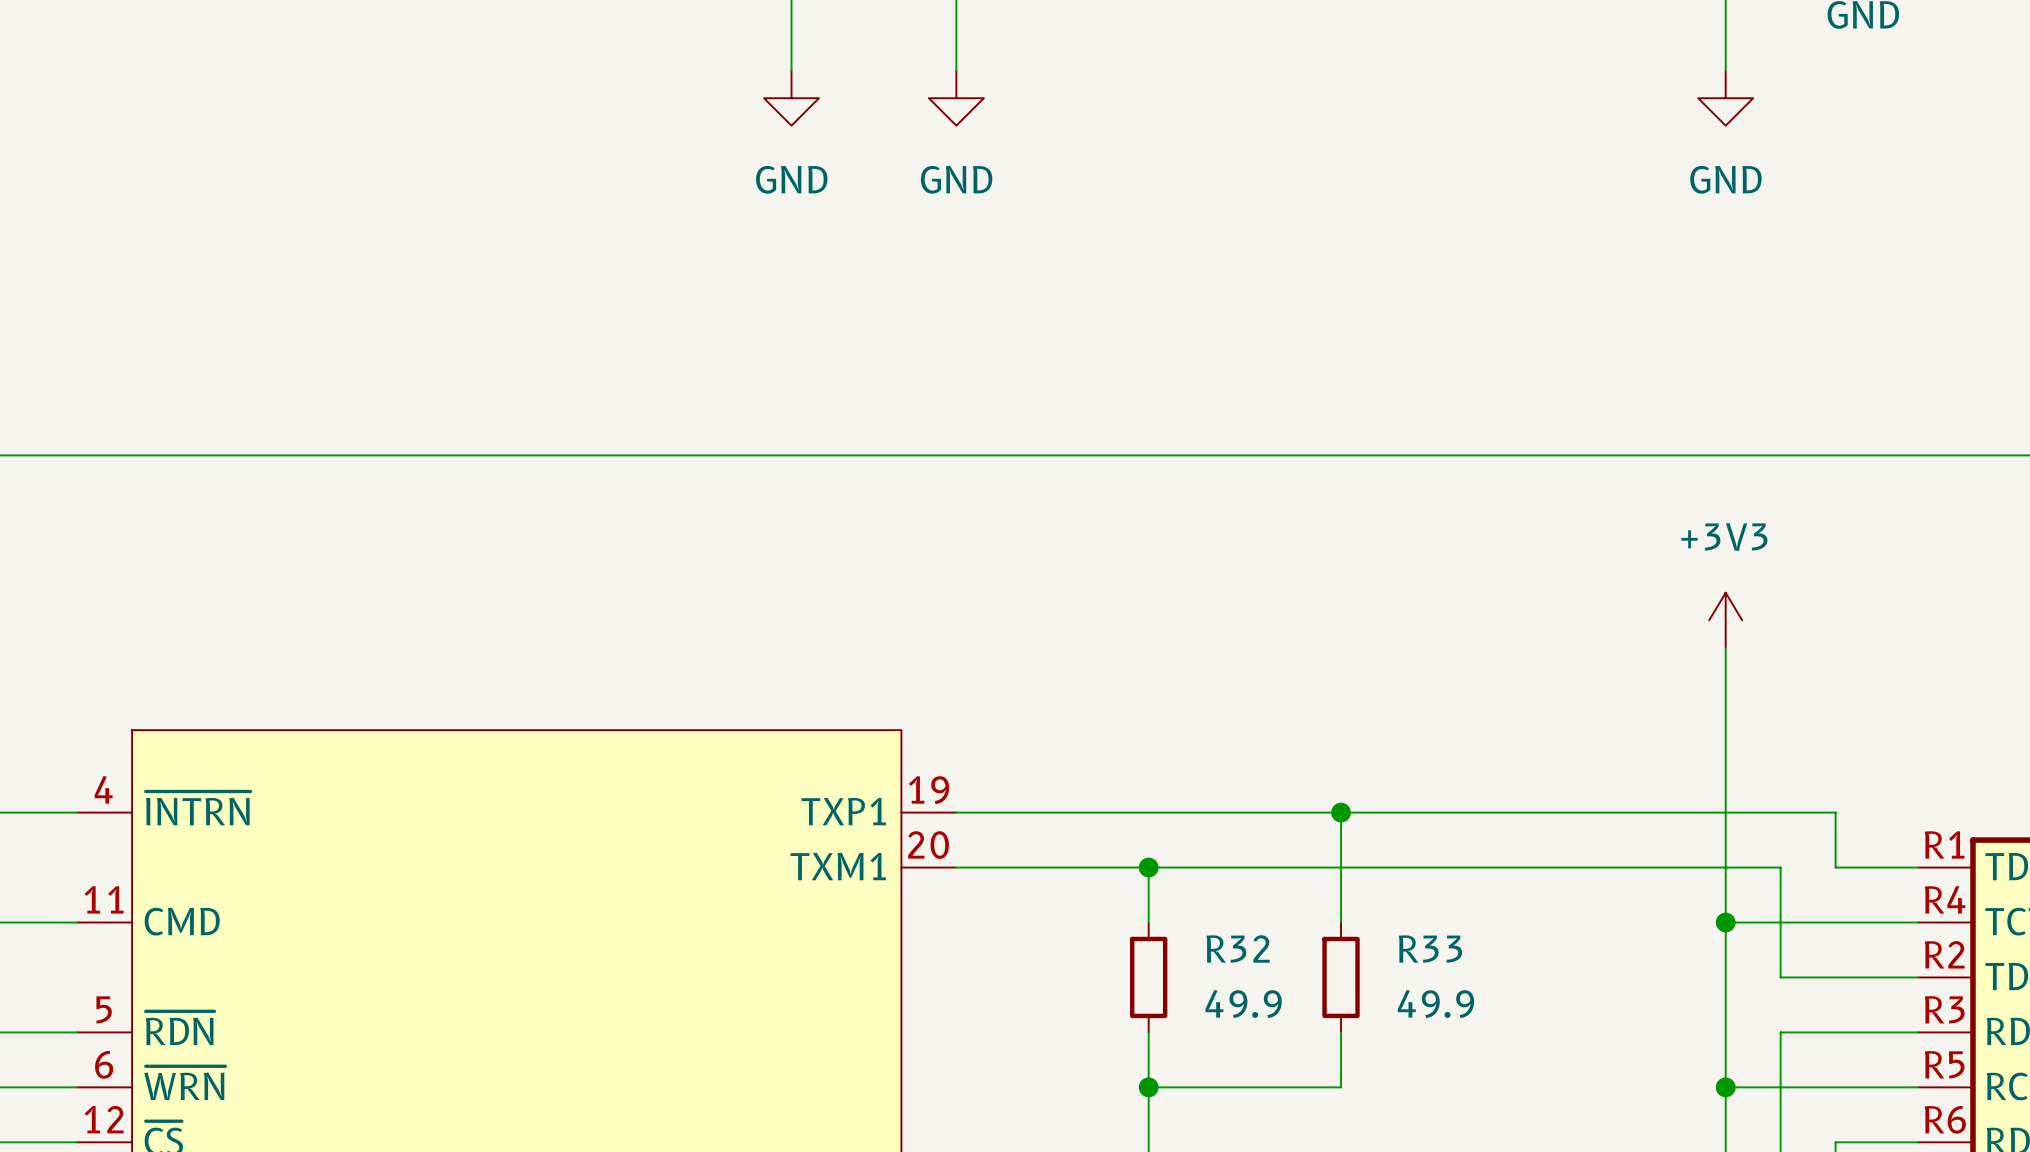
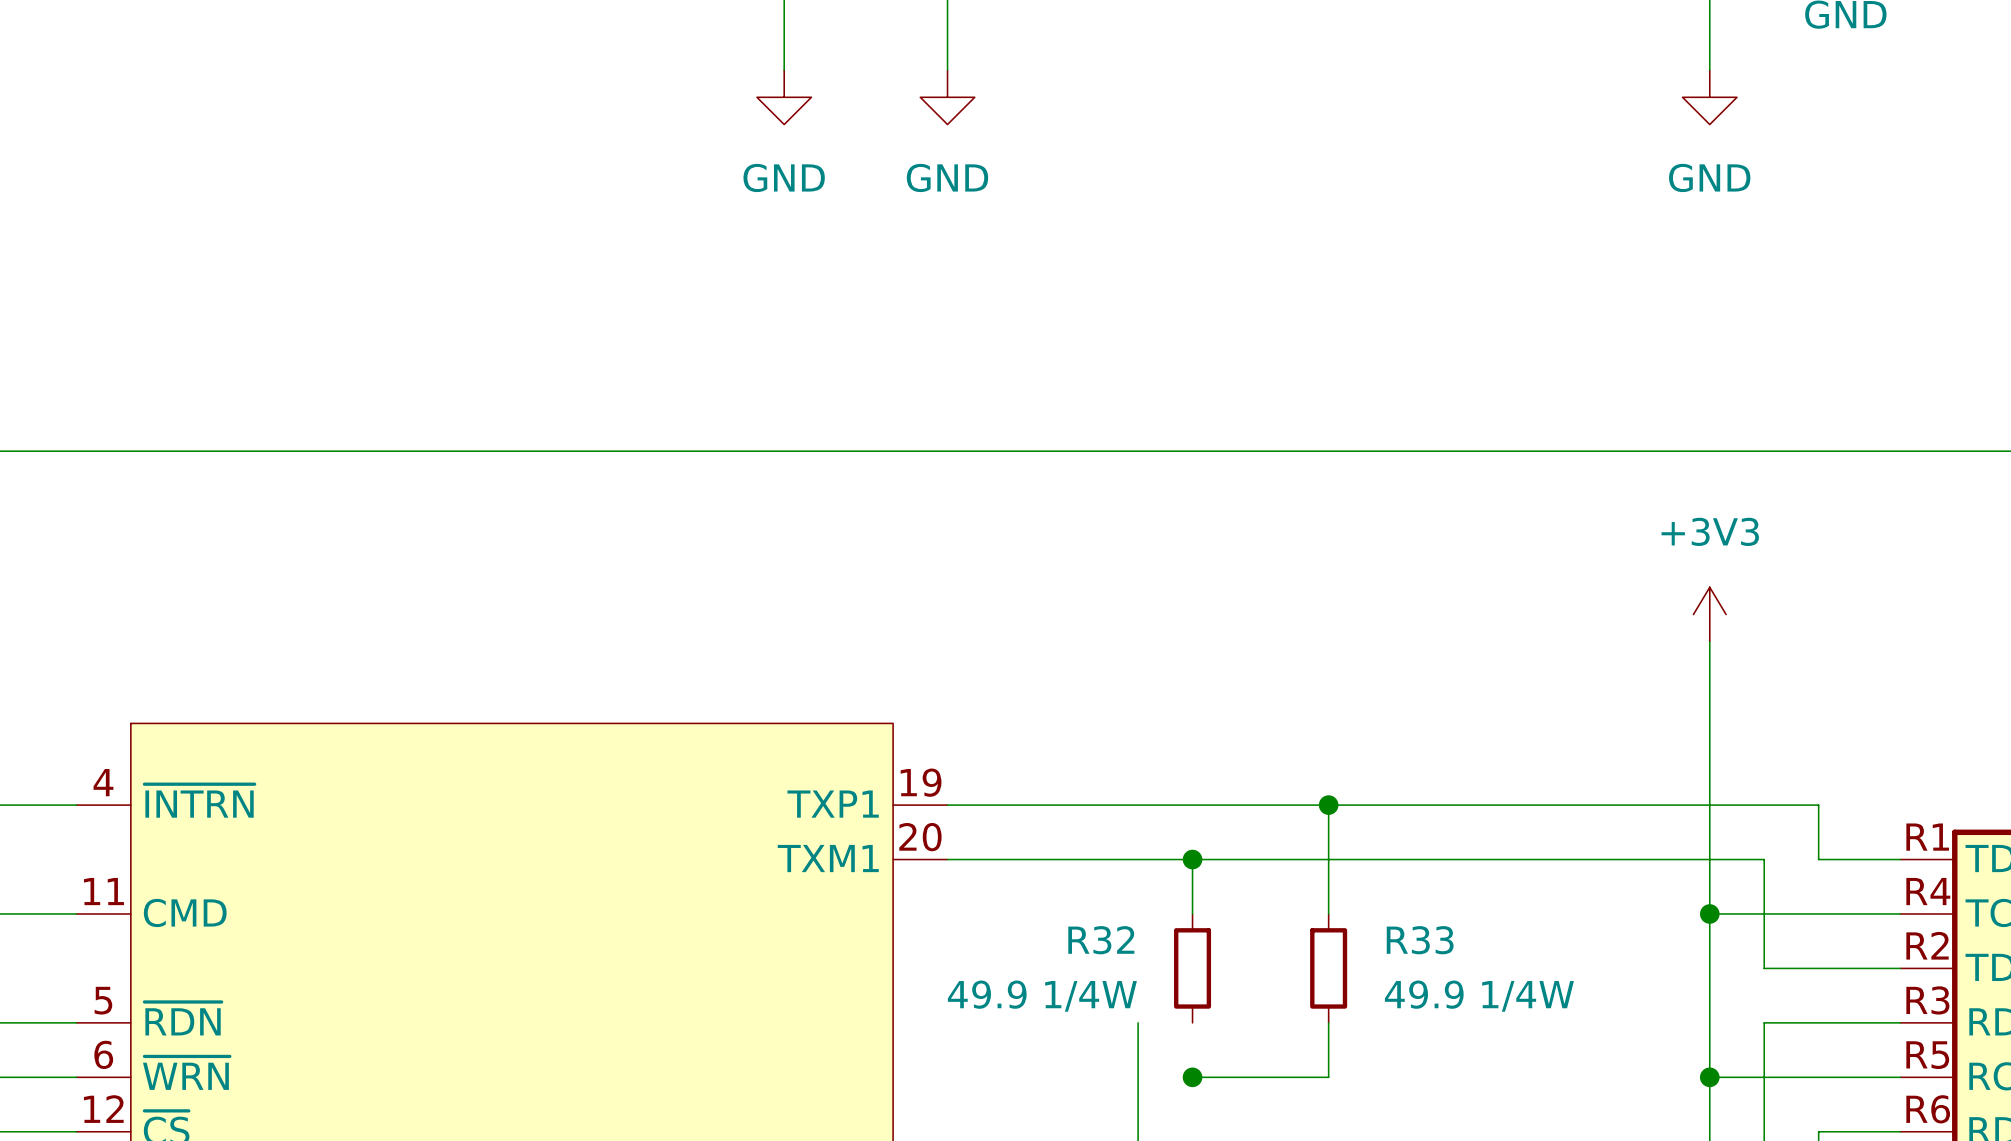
wire: (1148, 867) (1148, 922) -> (1192, 859) (1192, 913)
junction position: (1148, 867) -> (1192, 859)
R32 name position: R32 (1238, 948) -> R32 (1101, 940)
R32 position: (1148, 977) -> (1192, 968)
R32 value: 49.9 (1243, 1004) -> 49.9 1/4W (1042, 996)
R33 value: 49.9 (1435, 1004) -> 49.9 1/4W (1479, 996)
wire: (1148, 1087) (1203, 1087) -> none
junction position: (1148, 1087) -> (1192, 1077)

